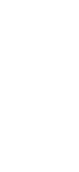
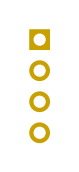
part: none -> (39, 86)

